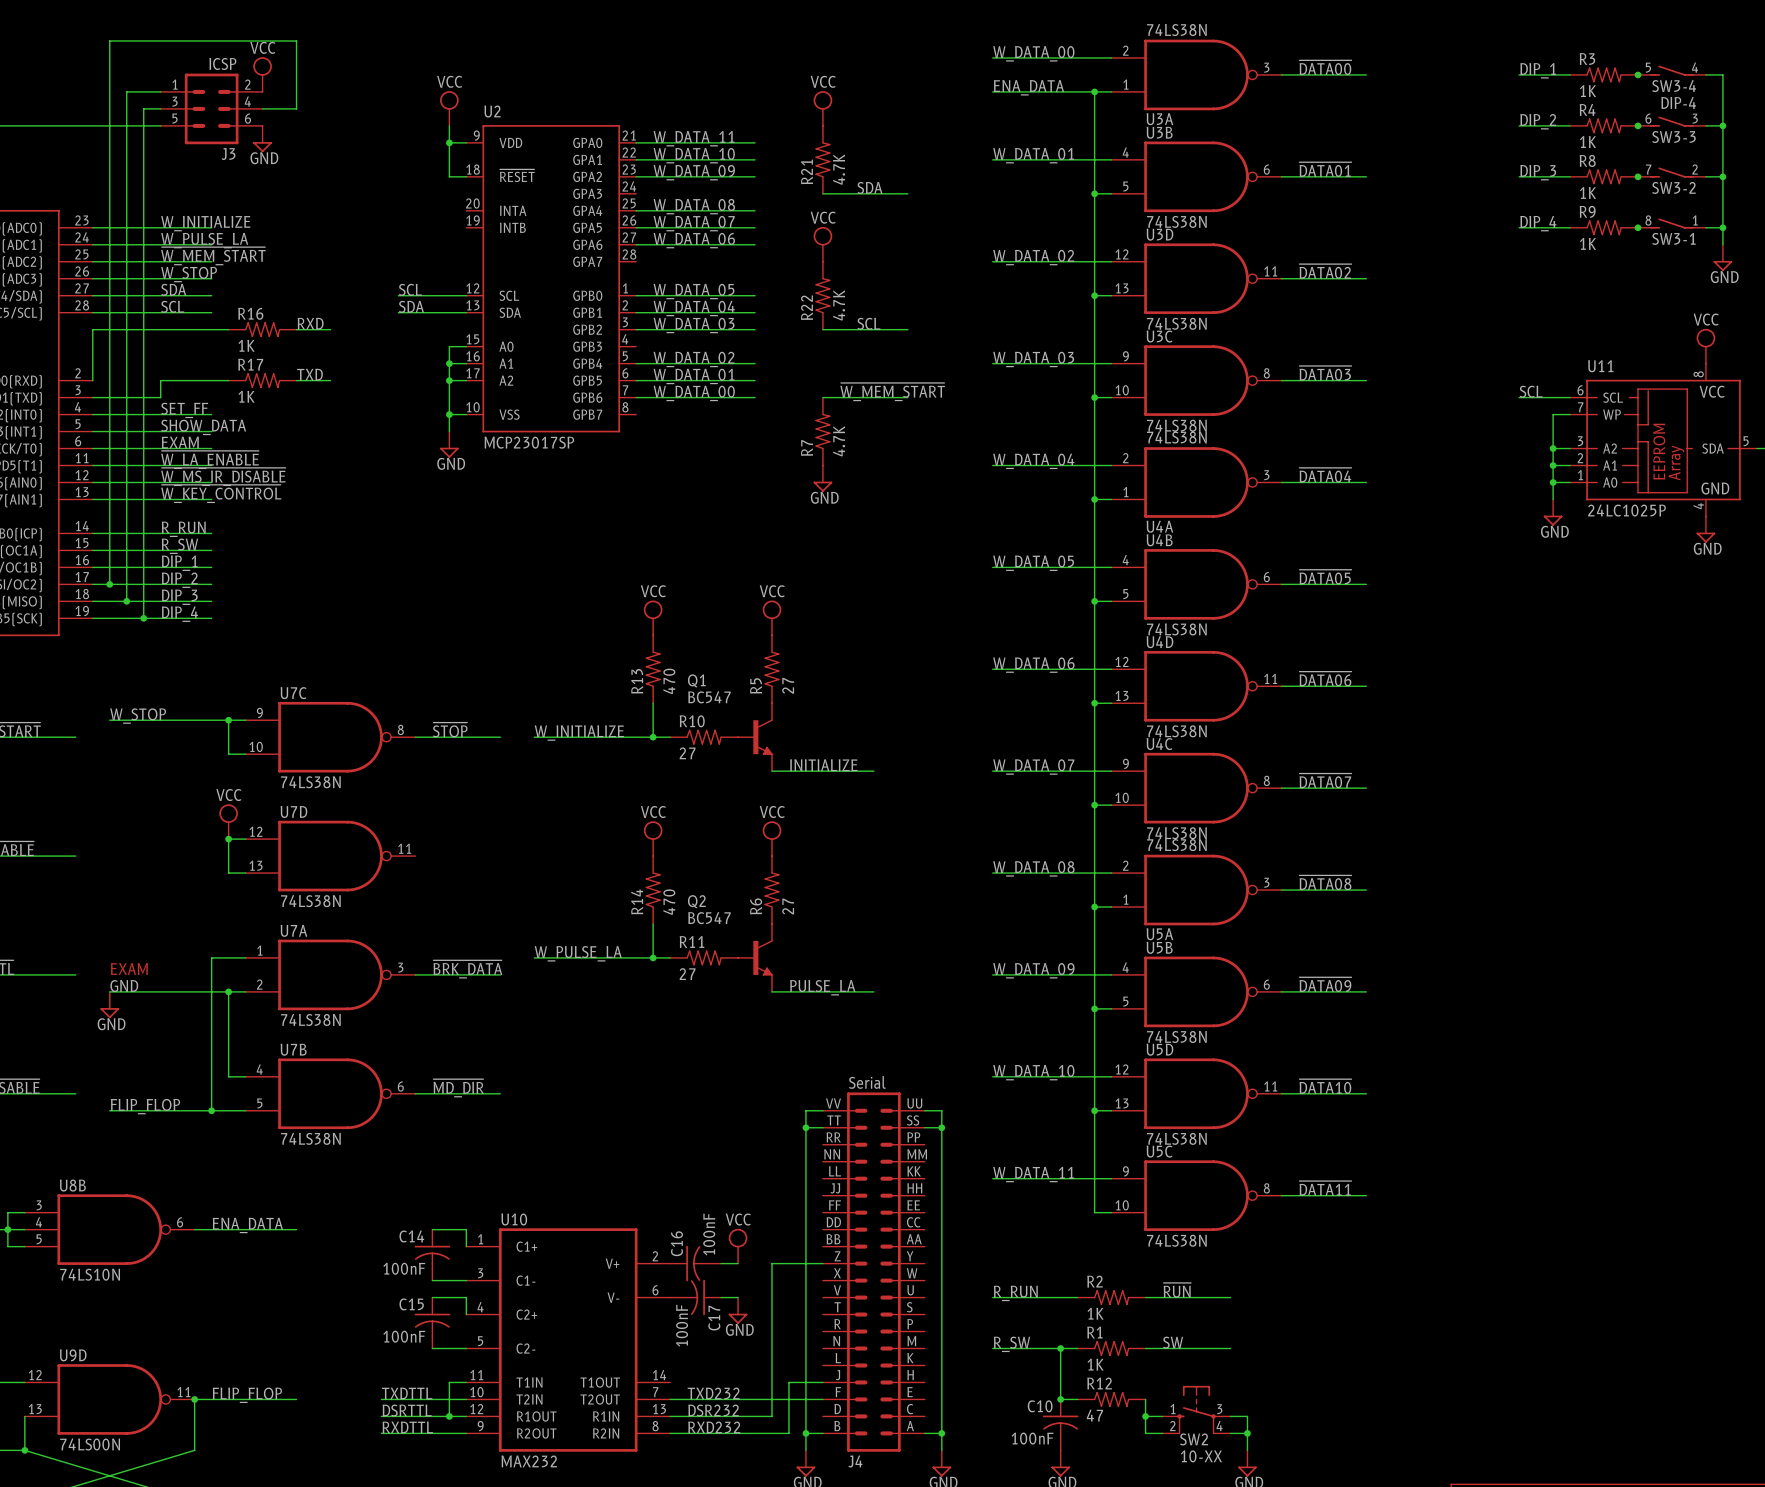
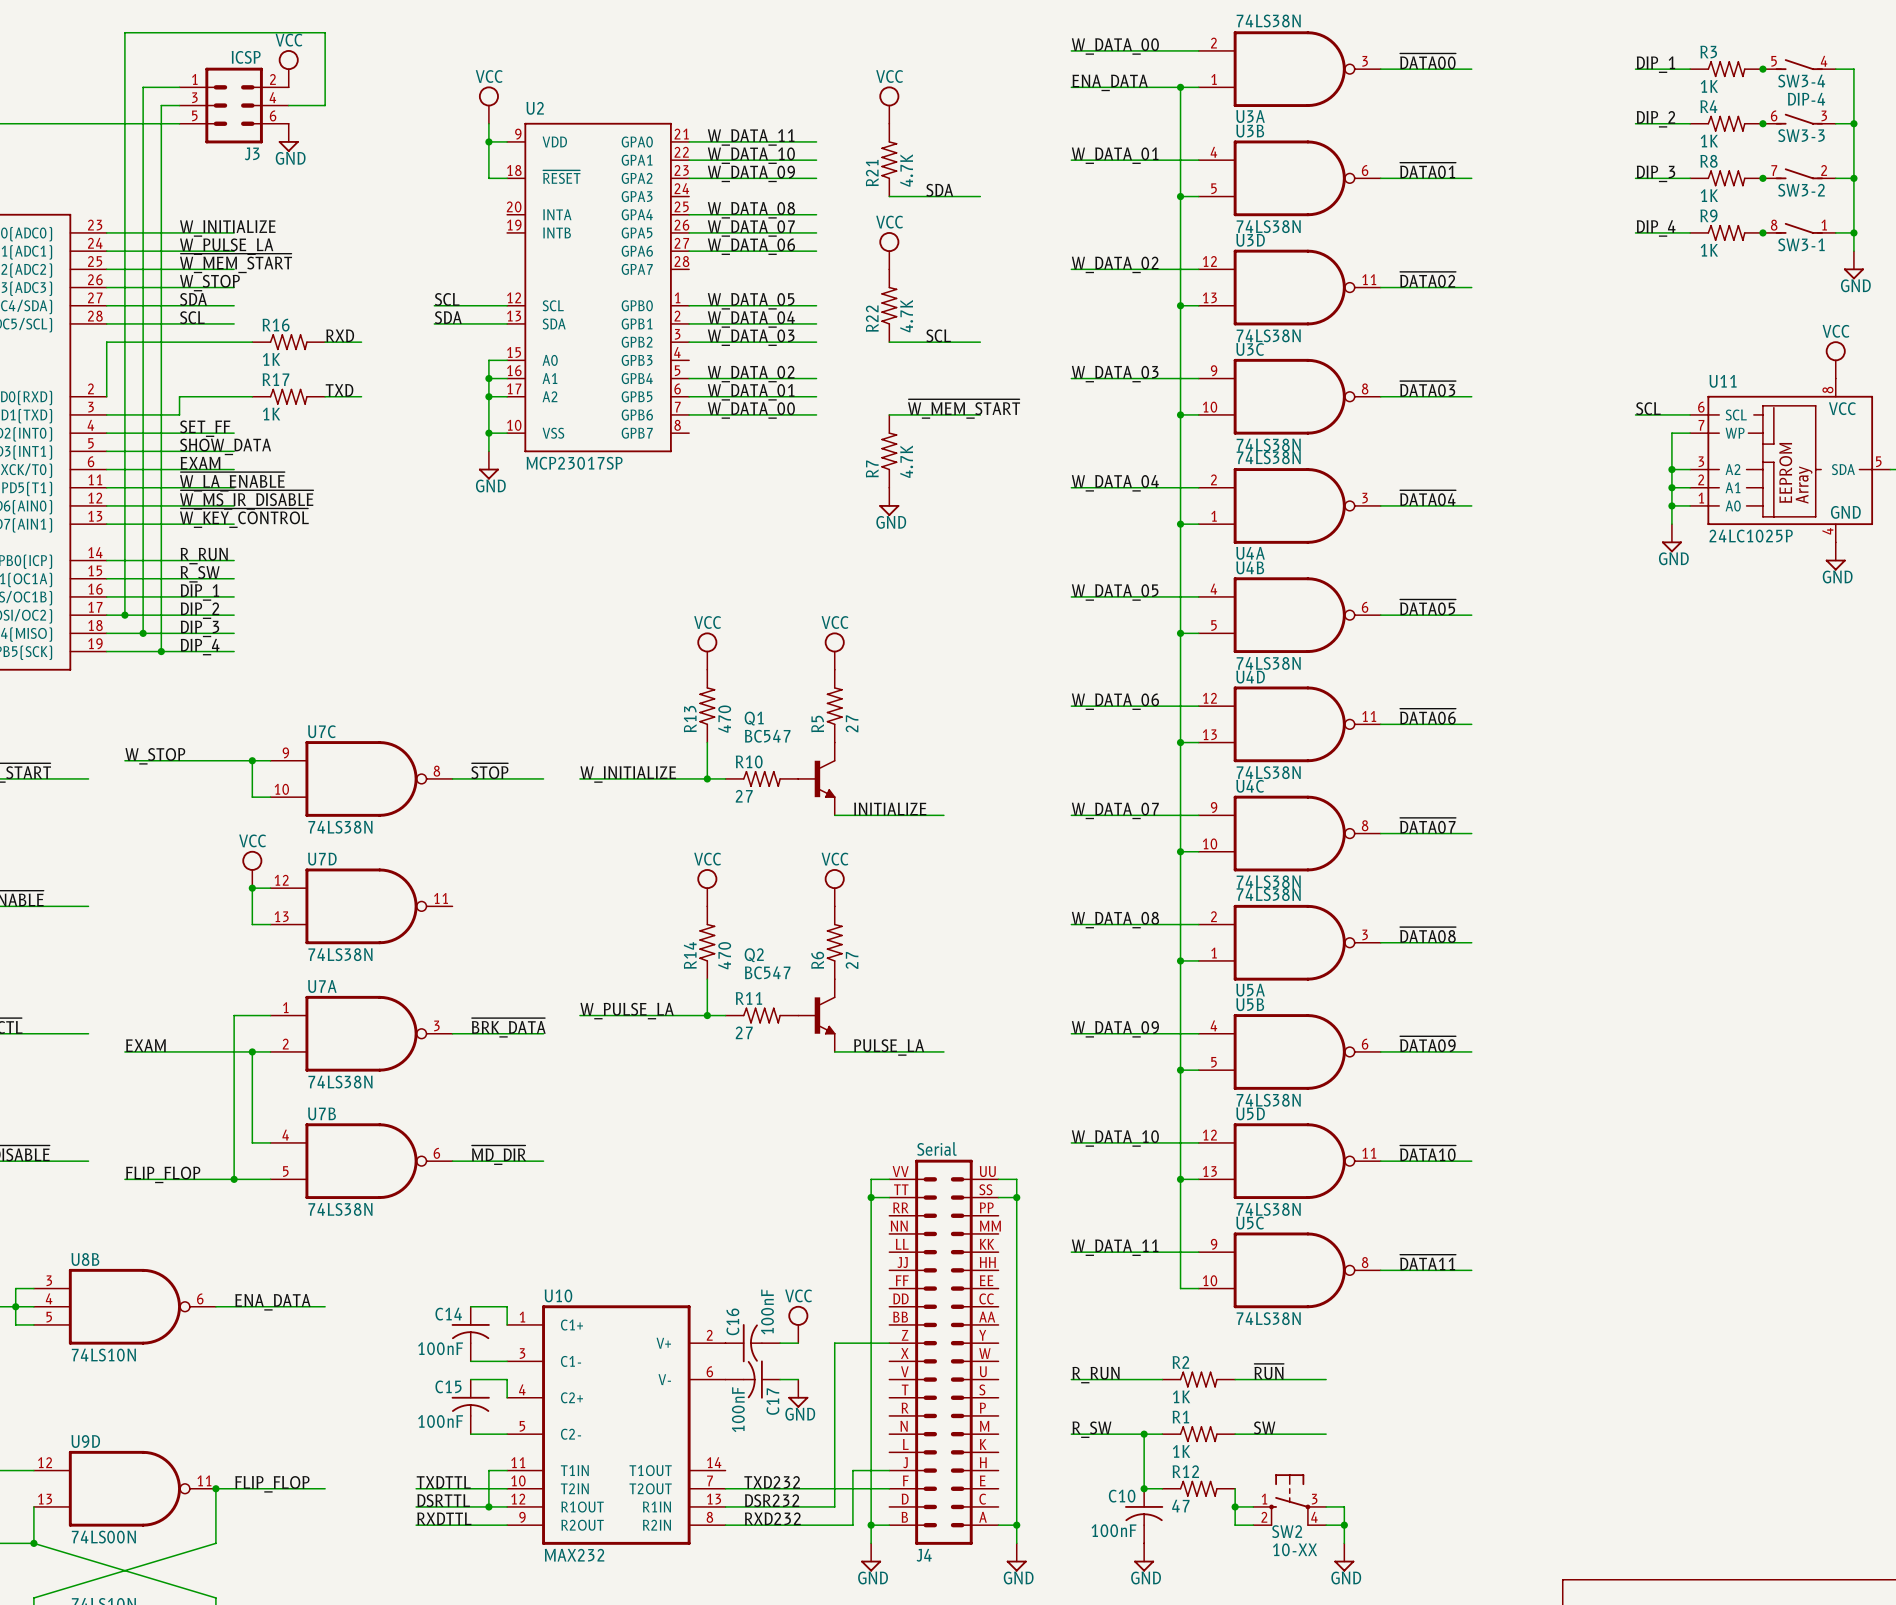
text: EXAM (129, 968) -> none
label: GND (124, 986) -> EXAM (145, 1045)
power symbol: GND (109, 1005) -> none

